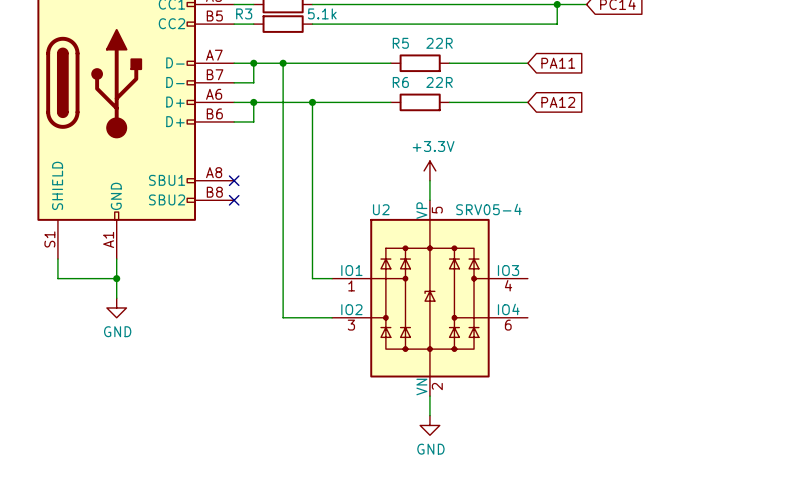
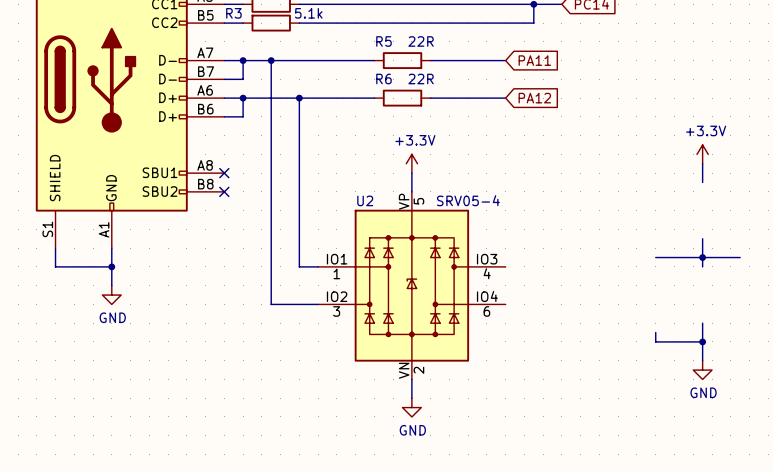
power symbol: none -> +3.3V (702, 154)
wire: none -> (702, 163) (702, 182)
wire: none -> (702, 238) (702, 266)
wire: none -> (655, 257) (740, 257)
junction: none -> (702, 257)
wire: none -> (702, 323) (702, 360)
wire: none -> (655, 332) (655, 341) (702, 341)
junction: none -> (702, 341)
power symbol: none -> GND (702, 370)

